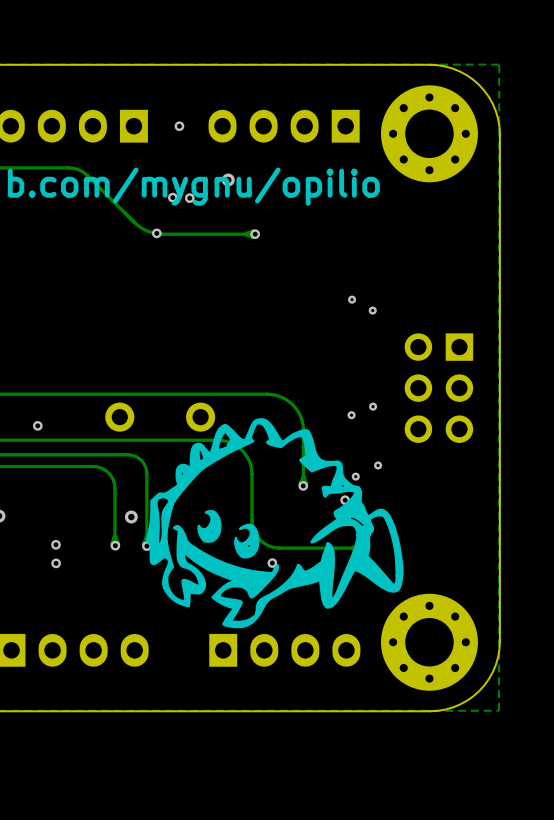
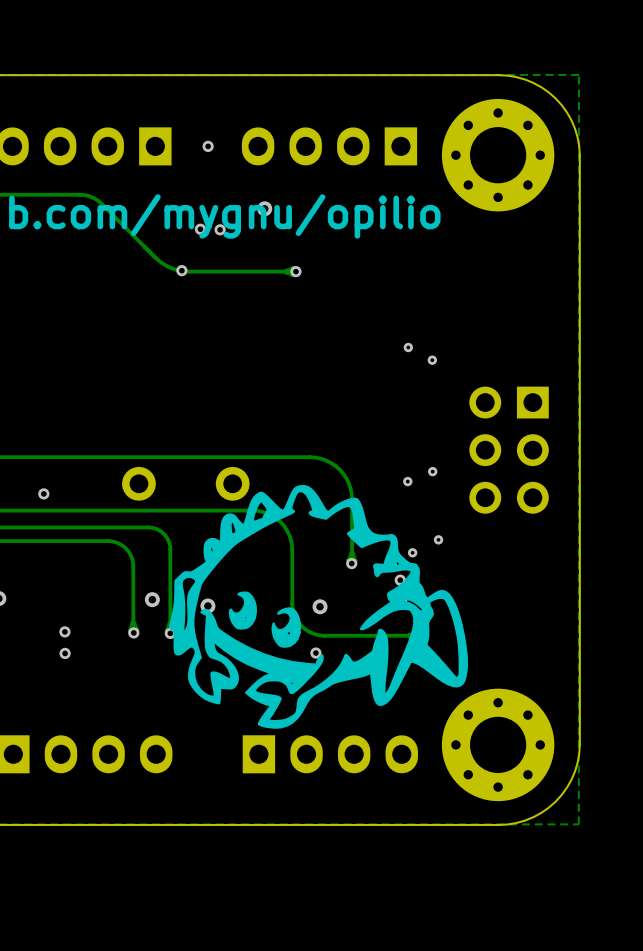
via: none -> (207, 606)
via: none -> (320, 606)

